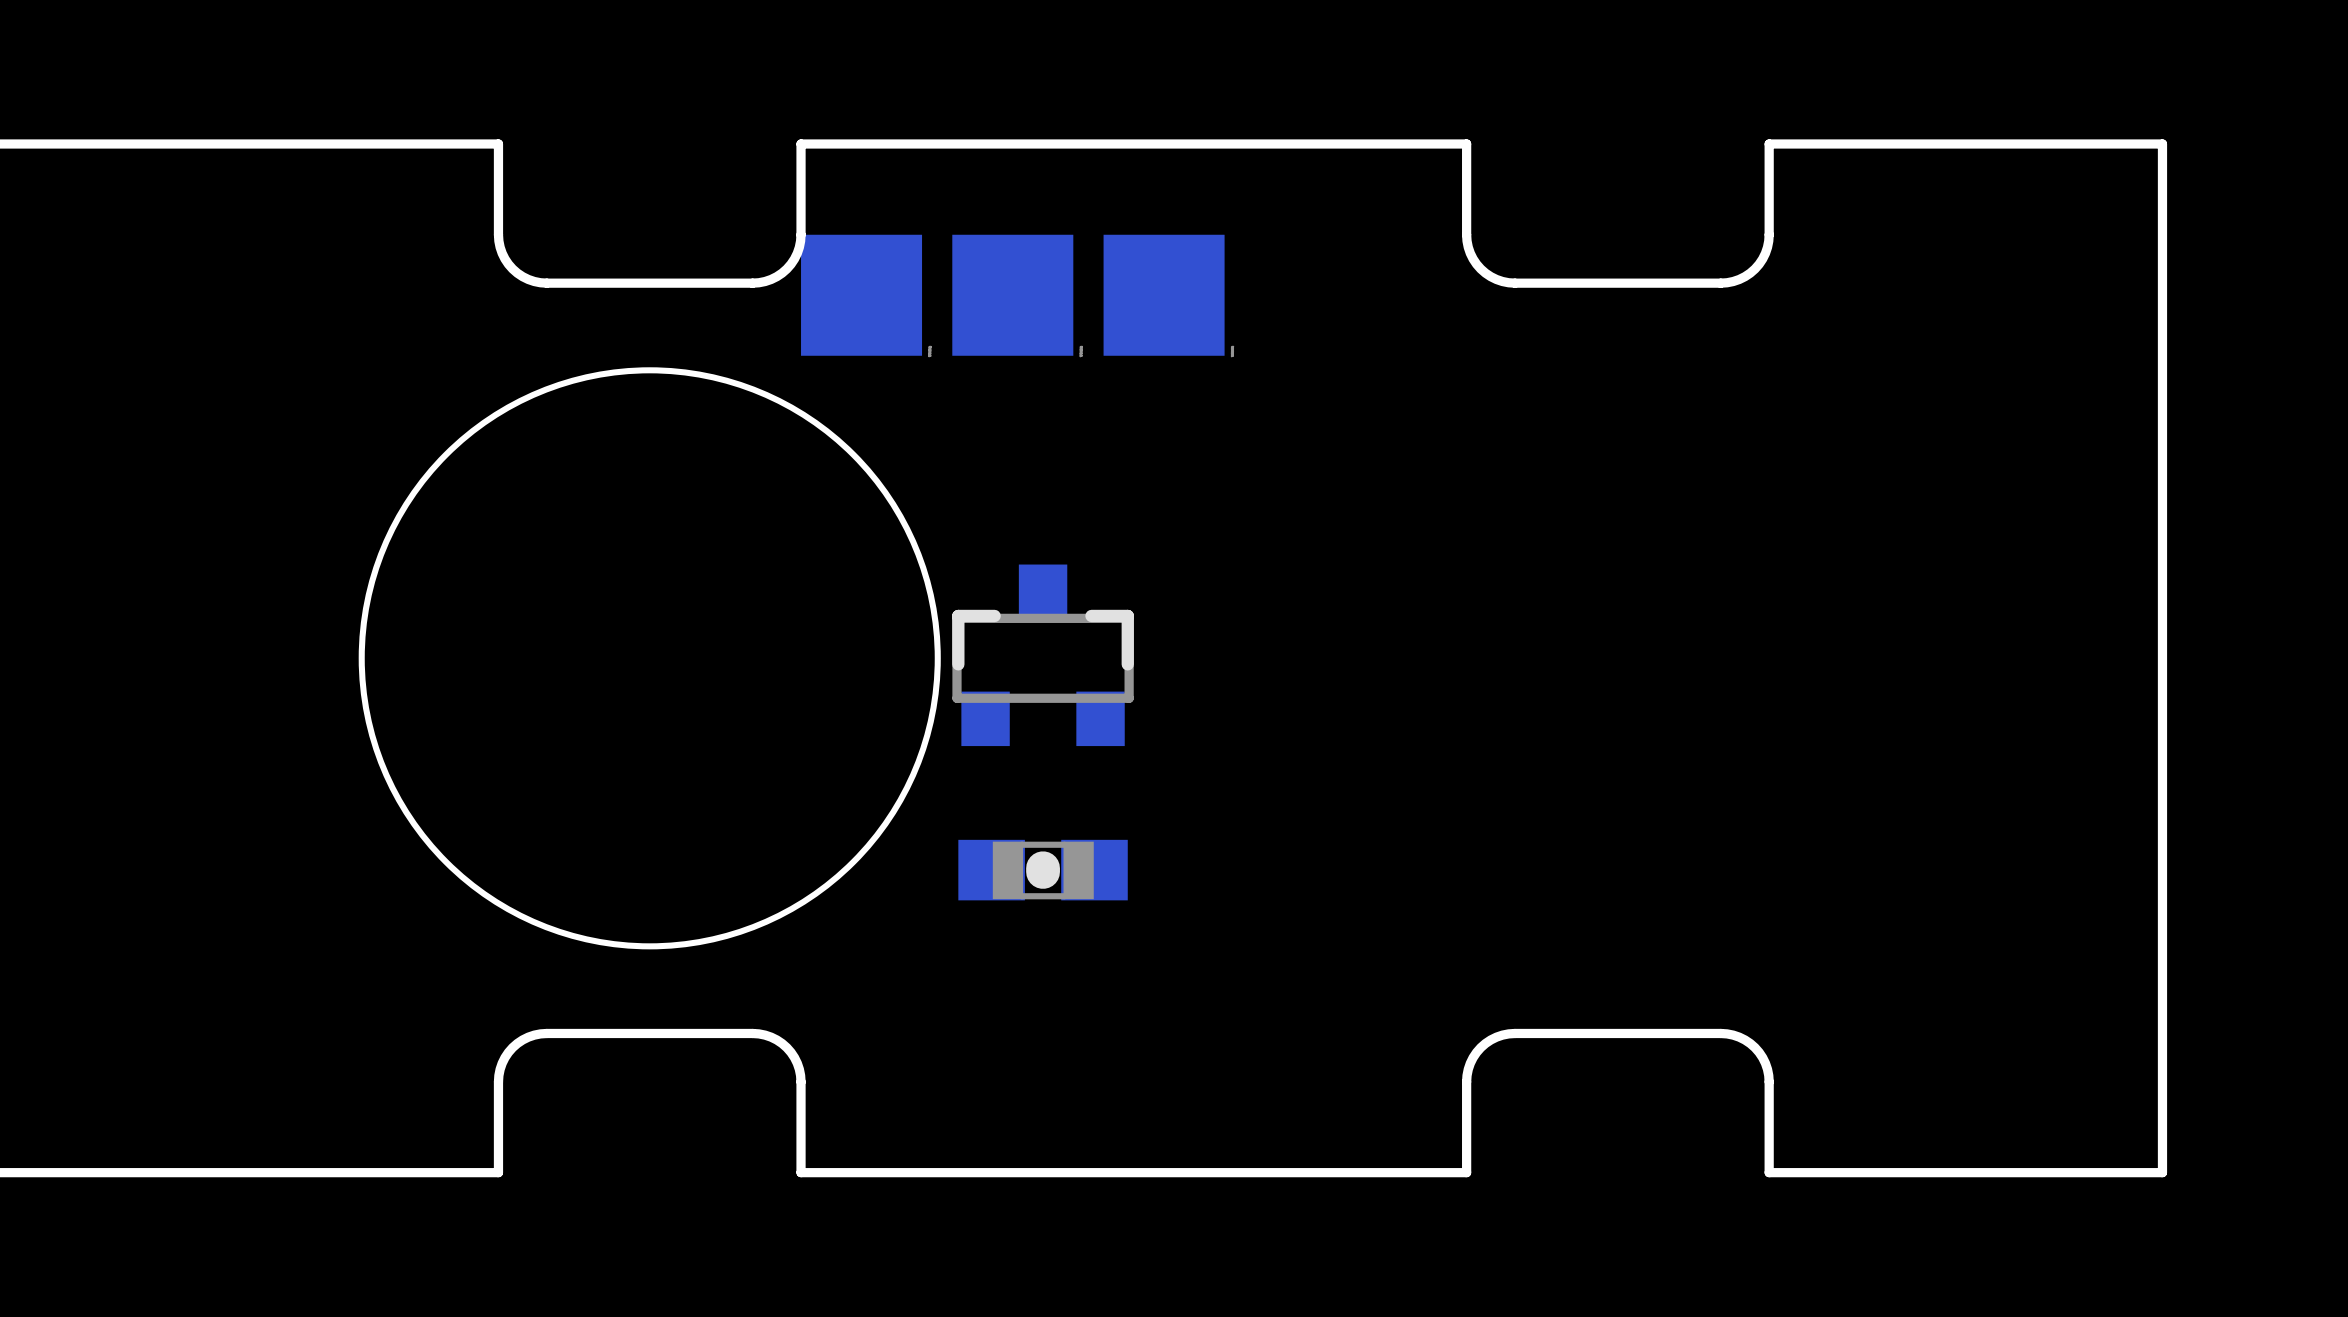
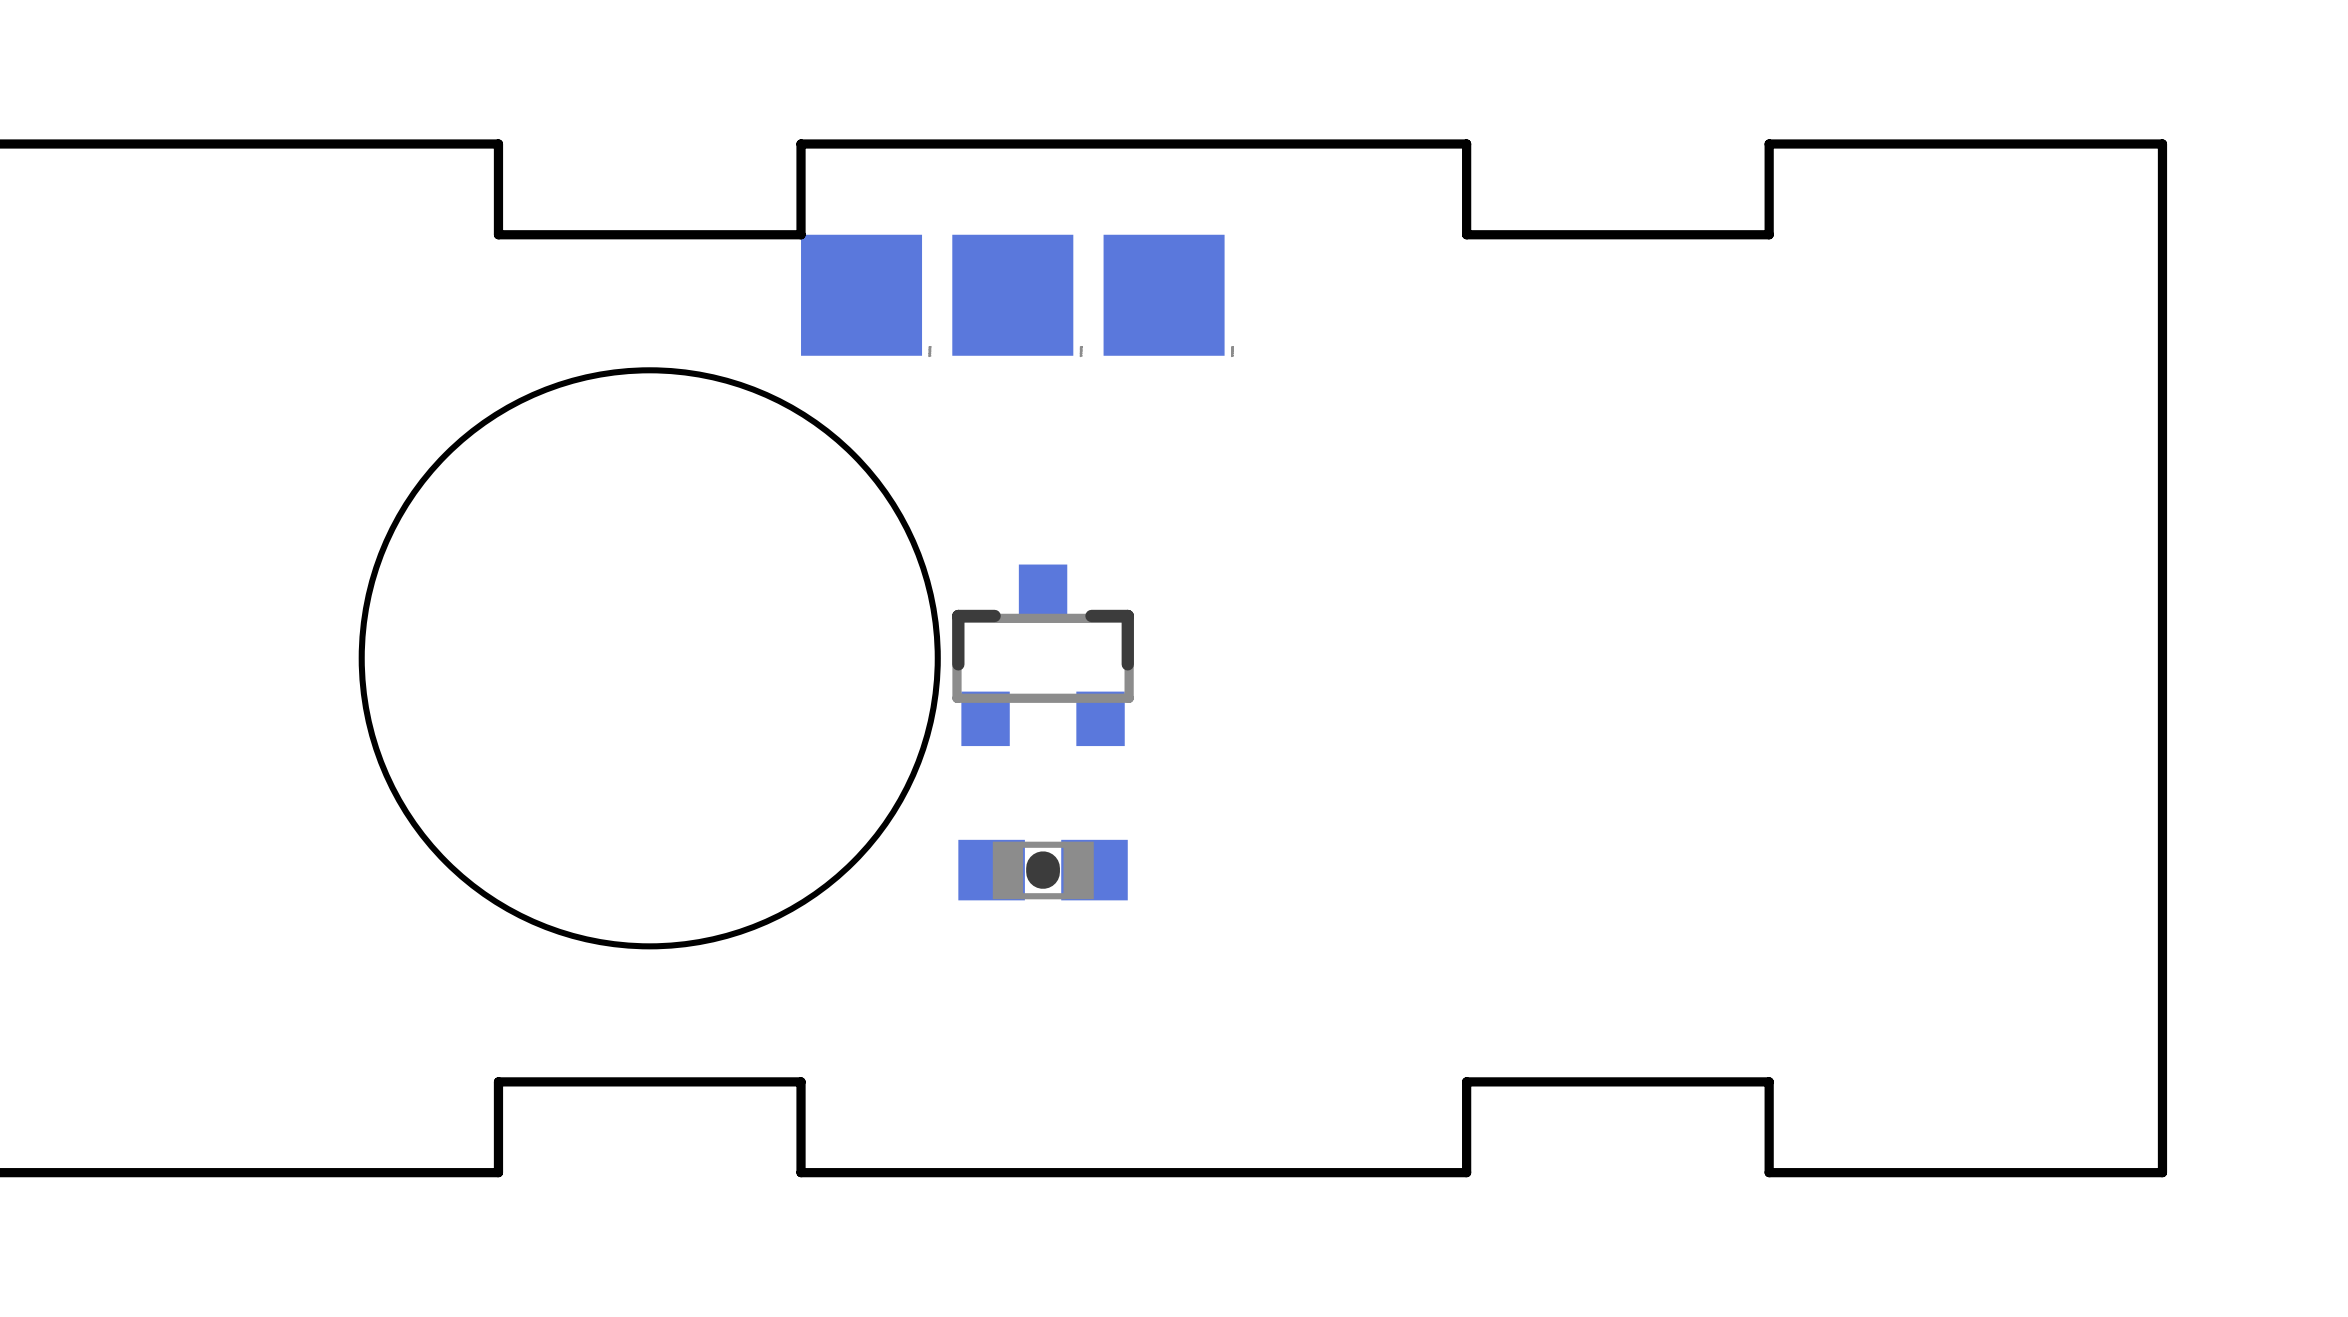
board edge: (801, 234) (797, 253) (786, 268) (771, 279) (752, 283) (540, 282) (522, 276) (512, 268) (502, 253) (498, 234) -> (801, 234) (498, 234)
board edge: (1769, 234) (1765, 253) (1754, 268) (1739, 279) (1720, 283) (1508, 282) (1490, 276) (1480, 268) (1470, 253) (1466, 234) -> (1769, 234) (1466, 234)
board edge: (801, 1081) (797, 1063) (786, 1047) (771, 1037) (752, 1033) (540, 1033) (522, 1039) (512, 1047) (502, 1063) (498, 1081) -> (801, 1081) (498, 1081)
board edge: (1769, 1081) (1765, 1063) (1754, 1047) (1739, 1037) (1720, 1033) (1508, 1033) (1490, 1039) (1480, 1047) (1470, 1063) (1466, 1081) -> (1769, 1081) (1466, 1081)

